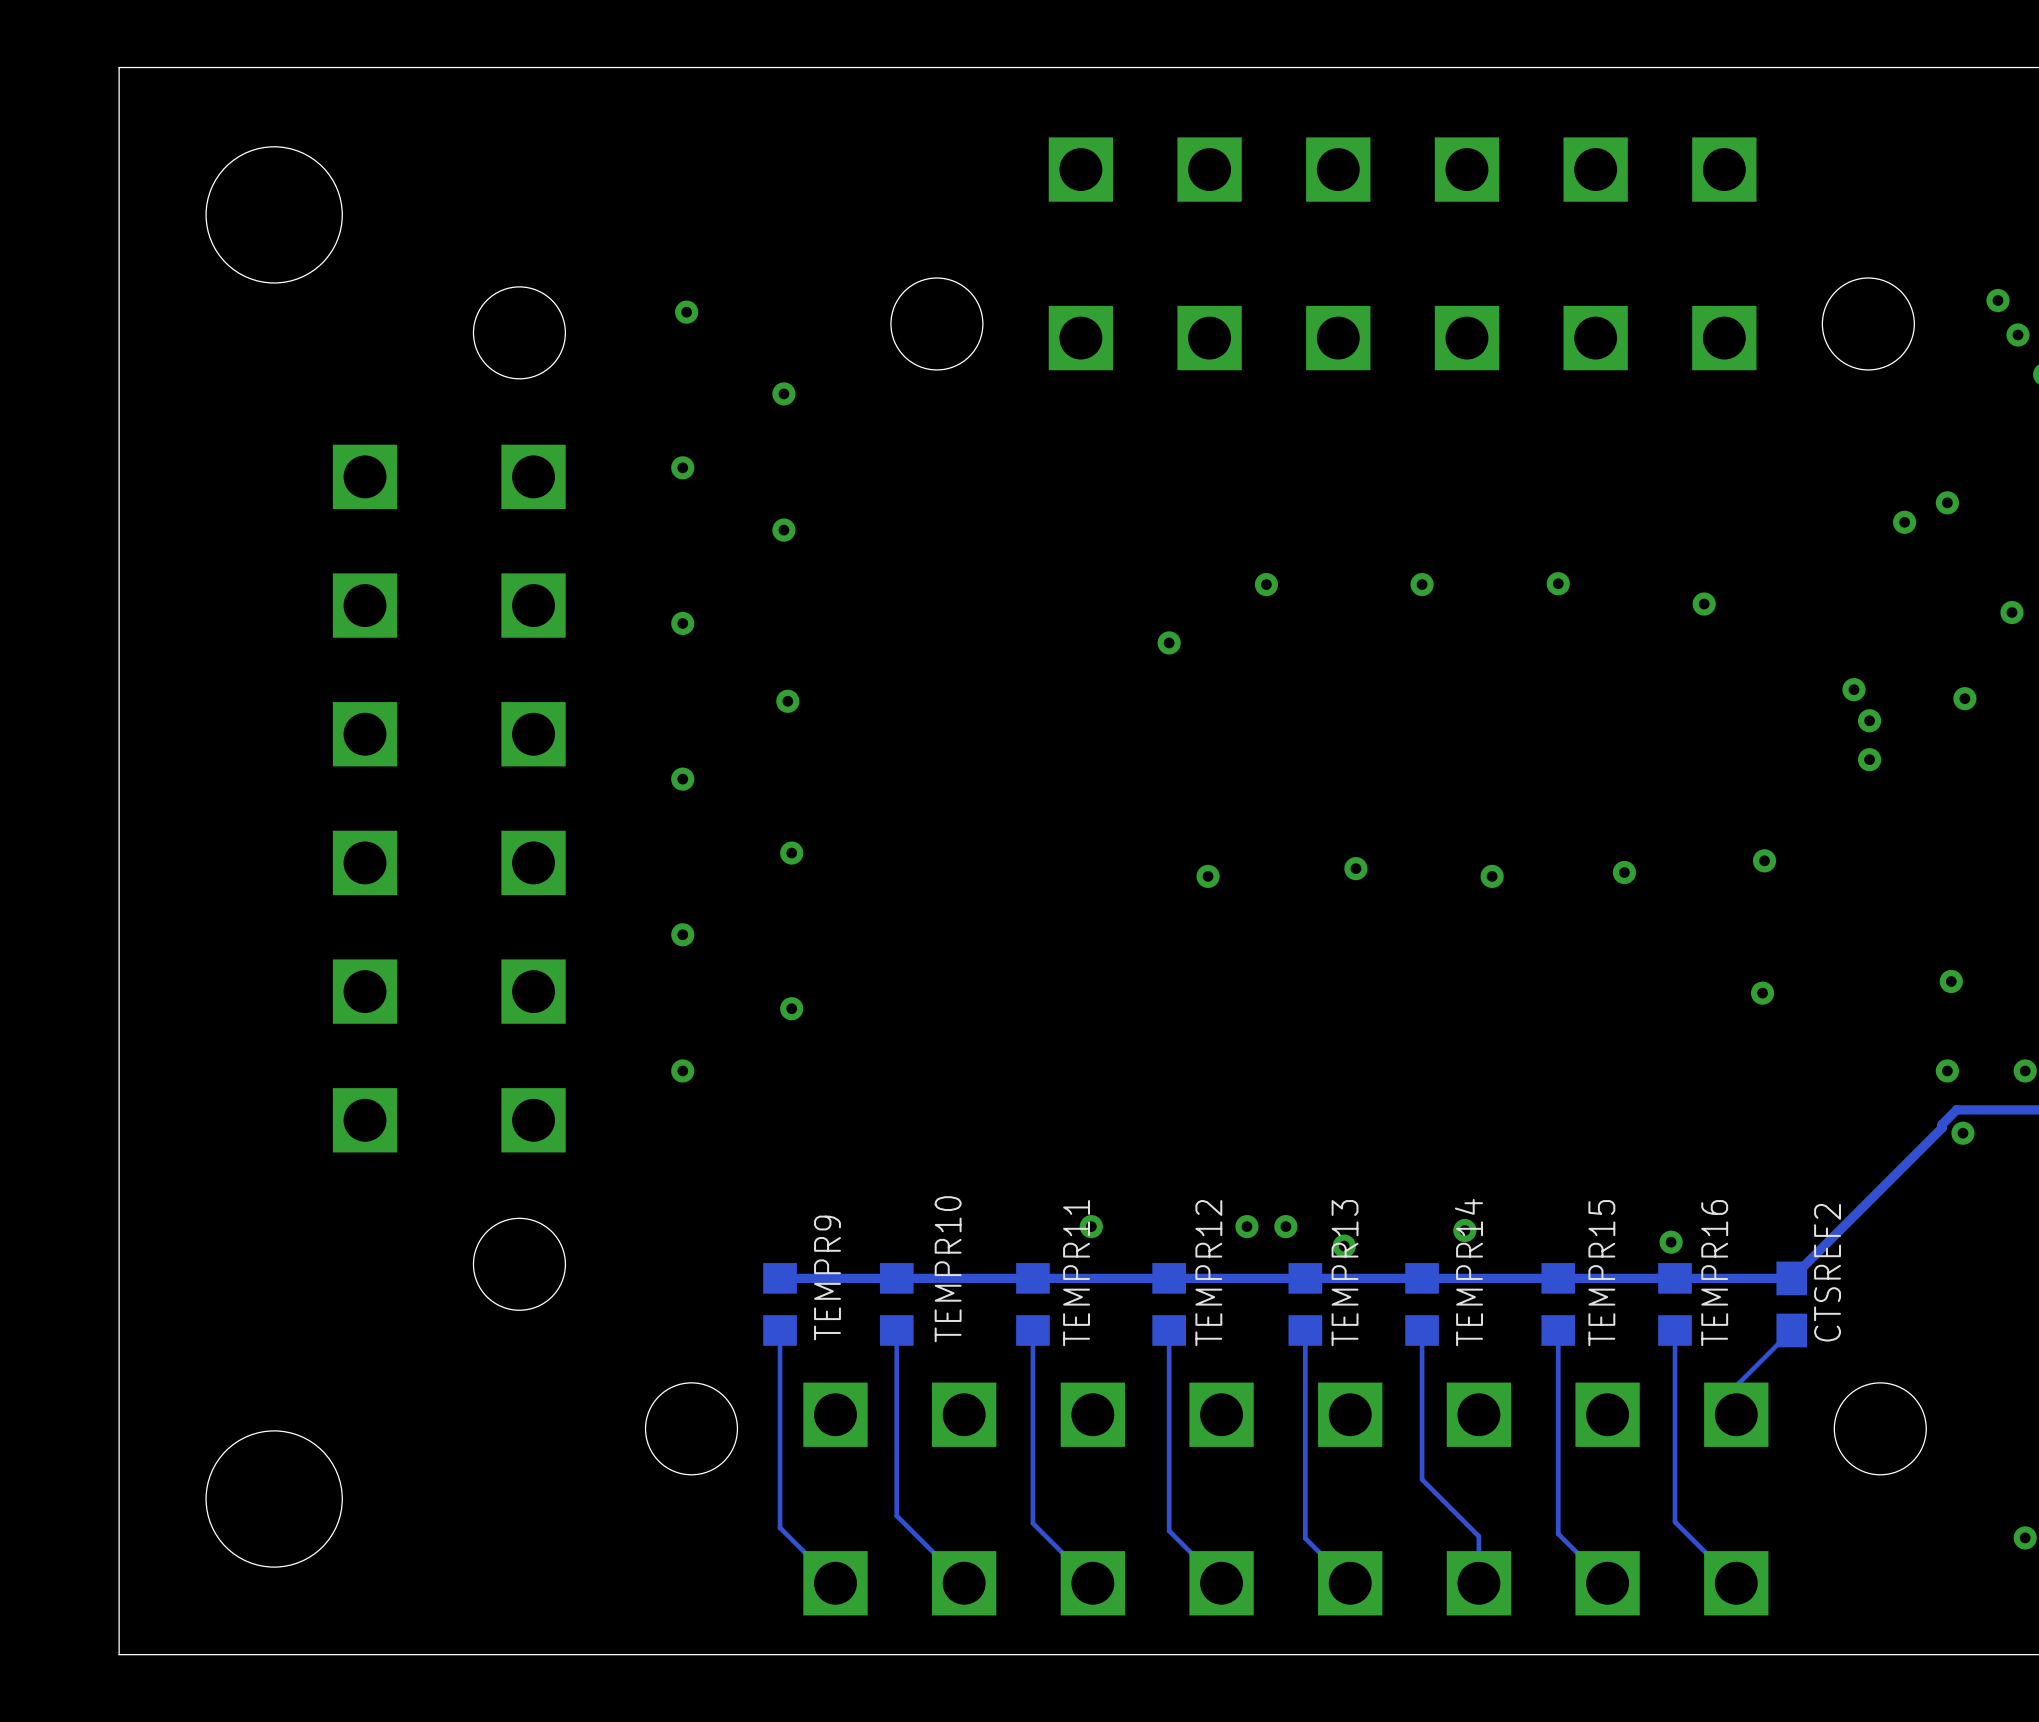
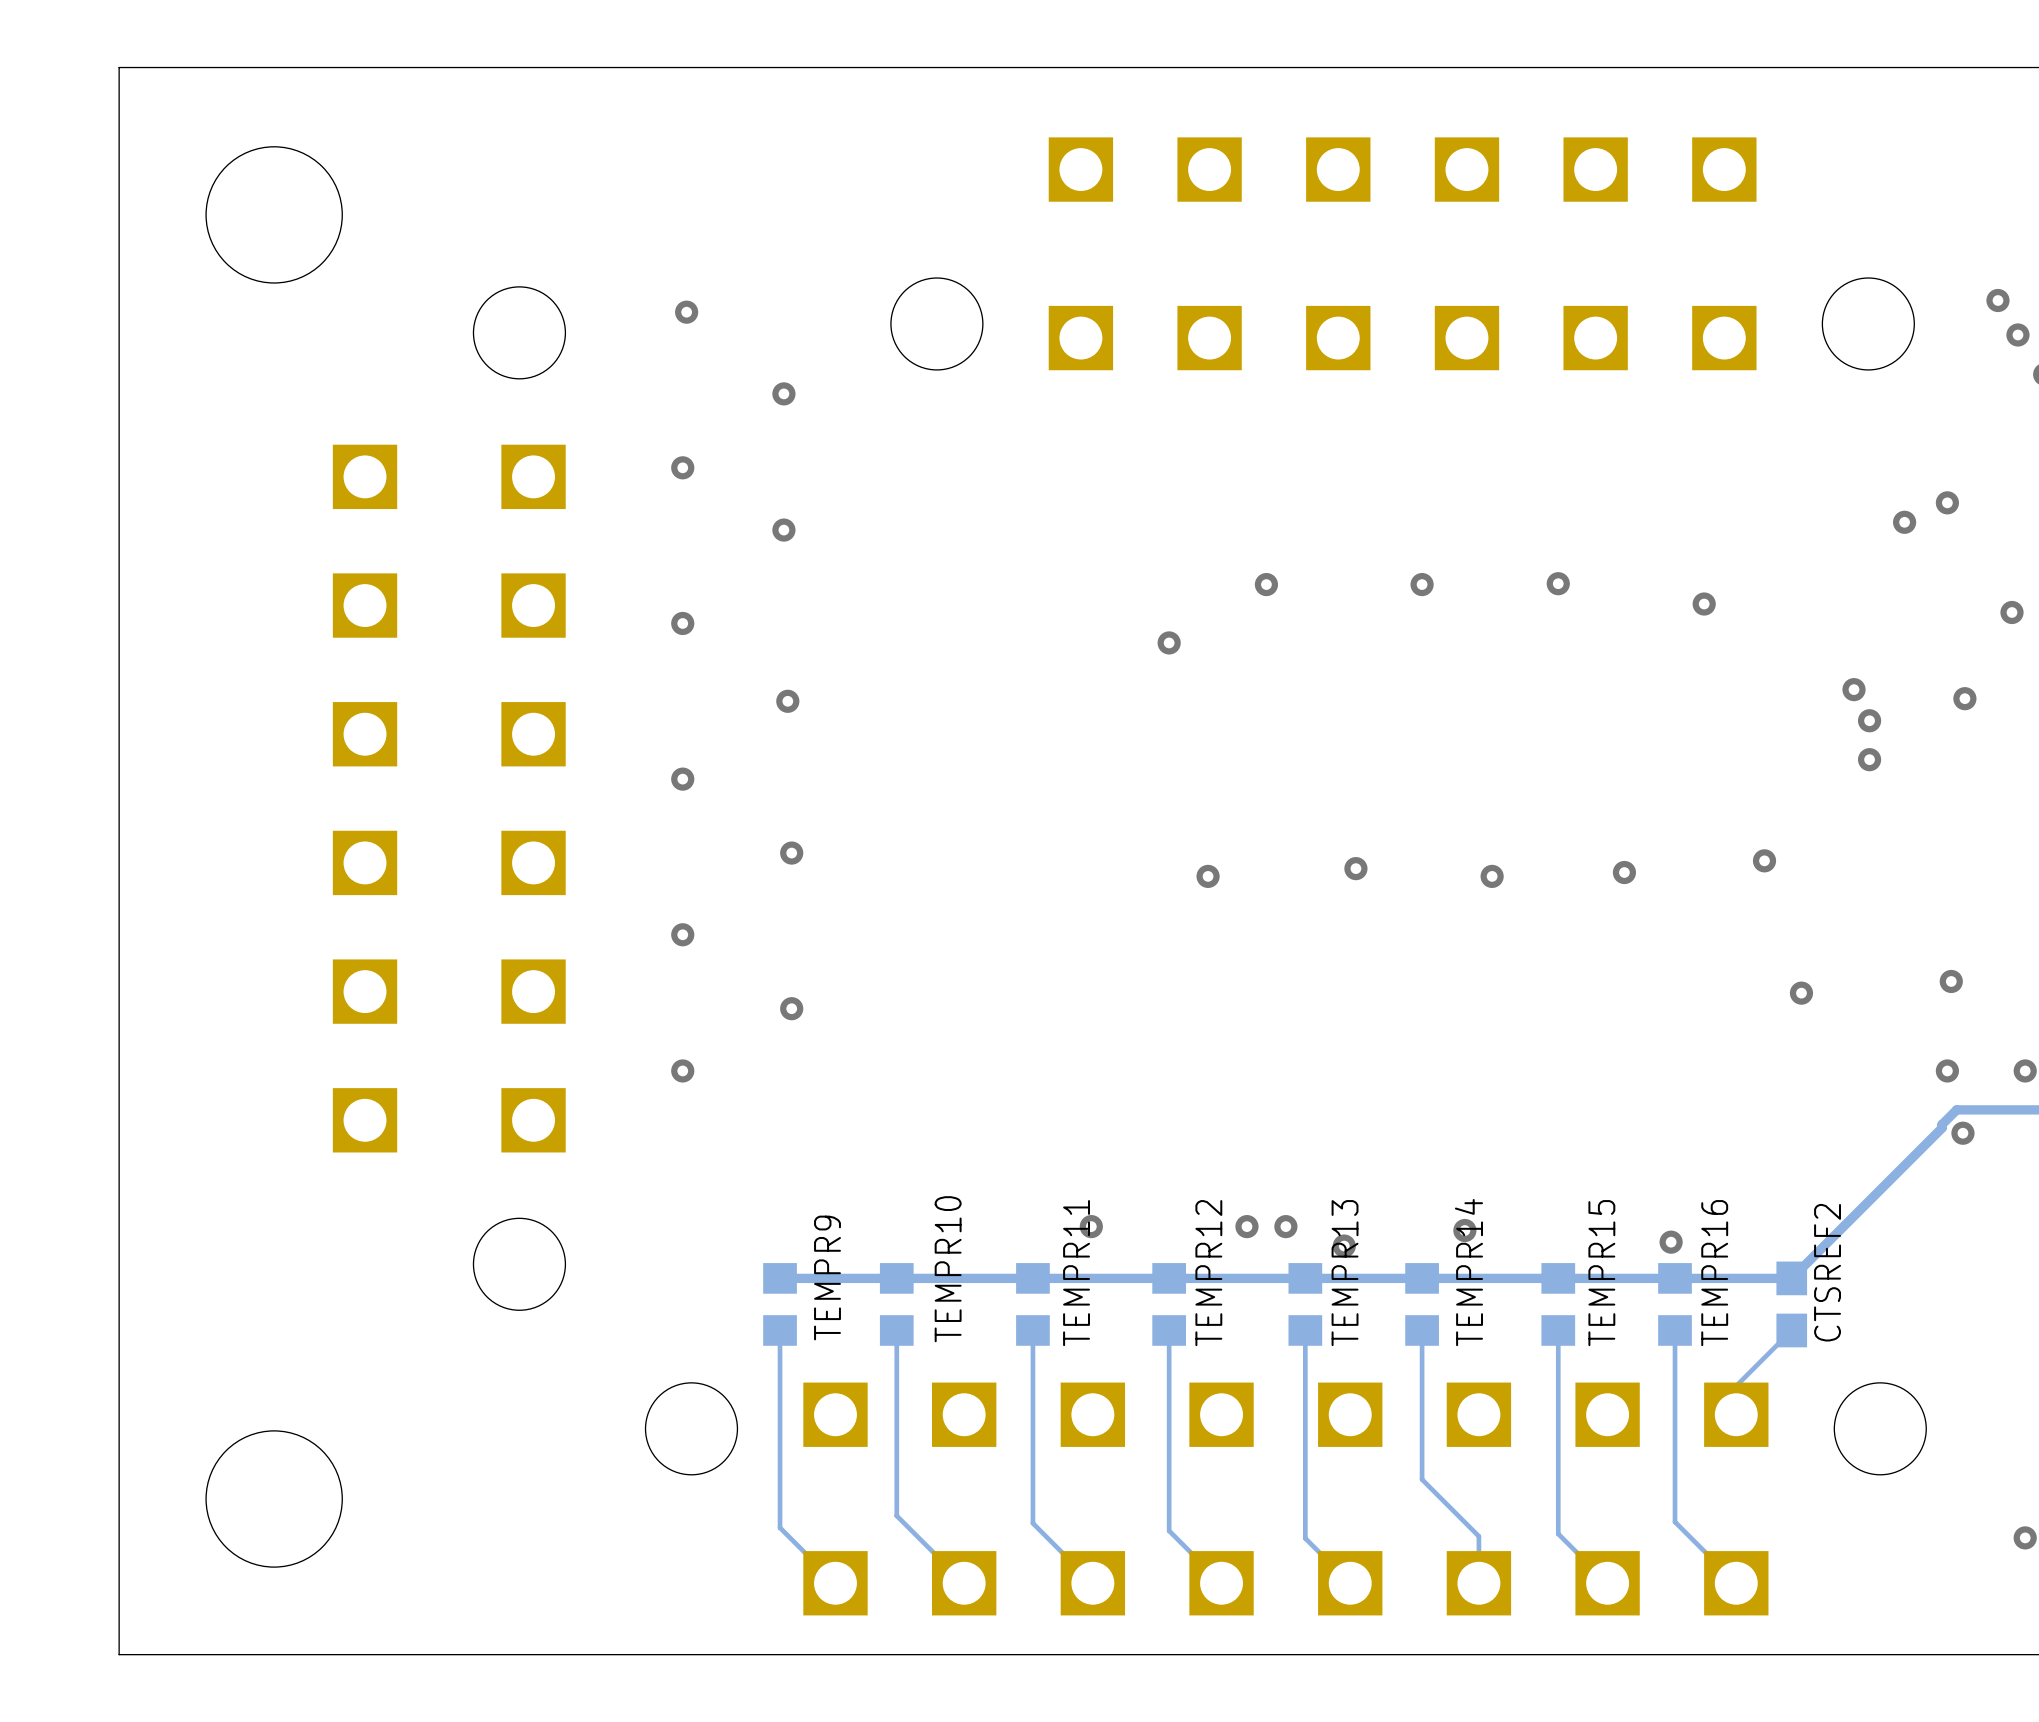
via position: (1762, 993) -> (1801, 993)

